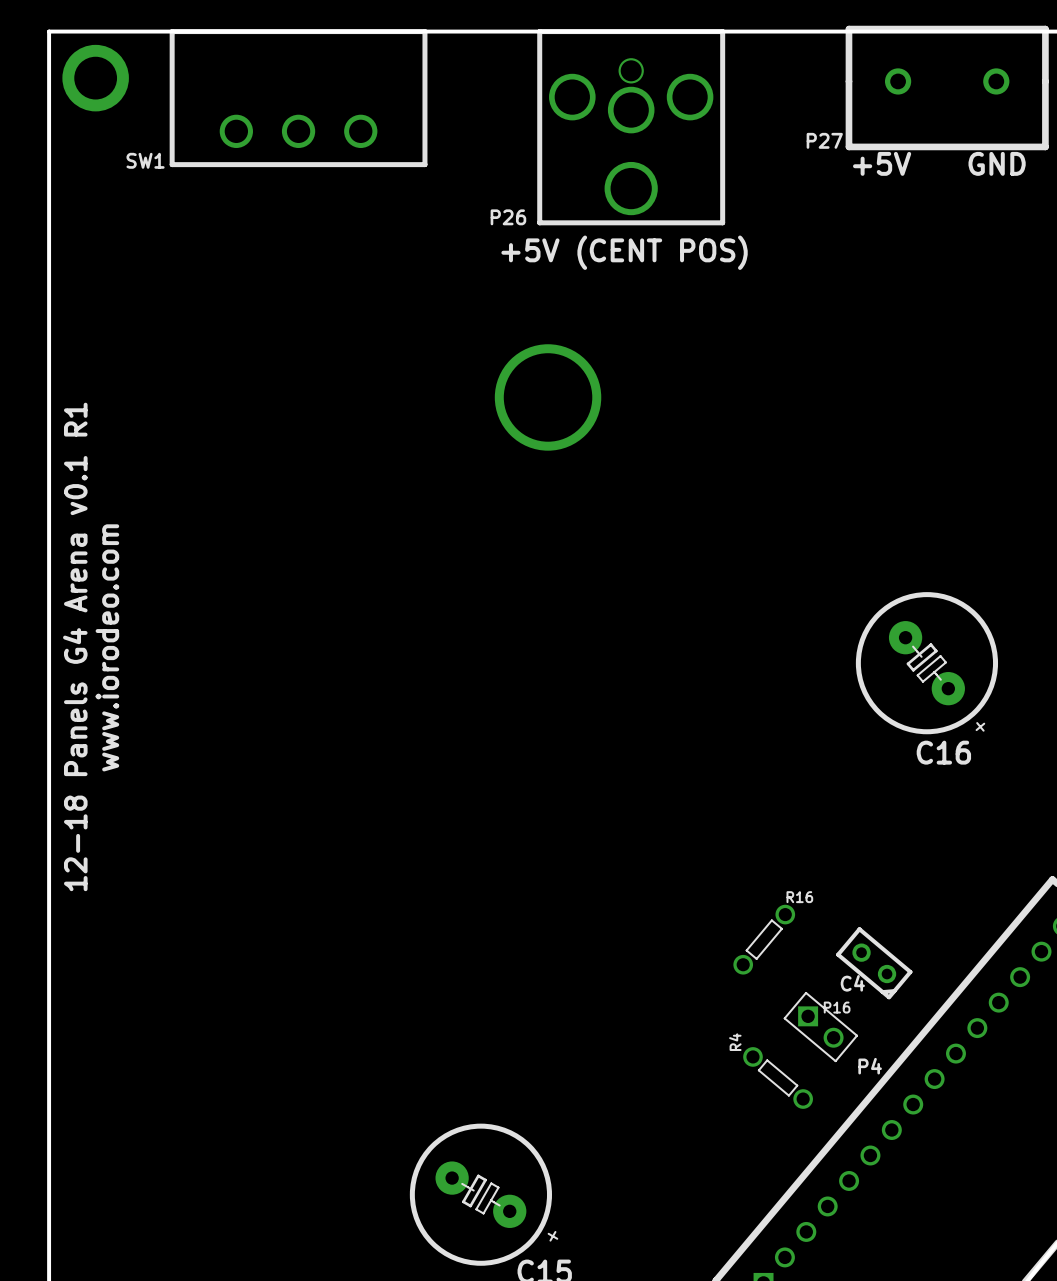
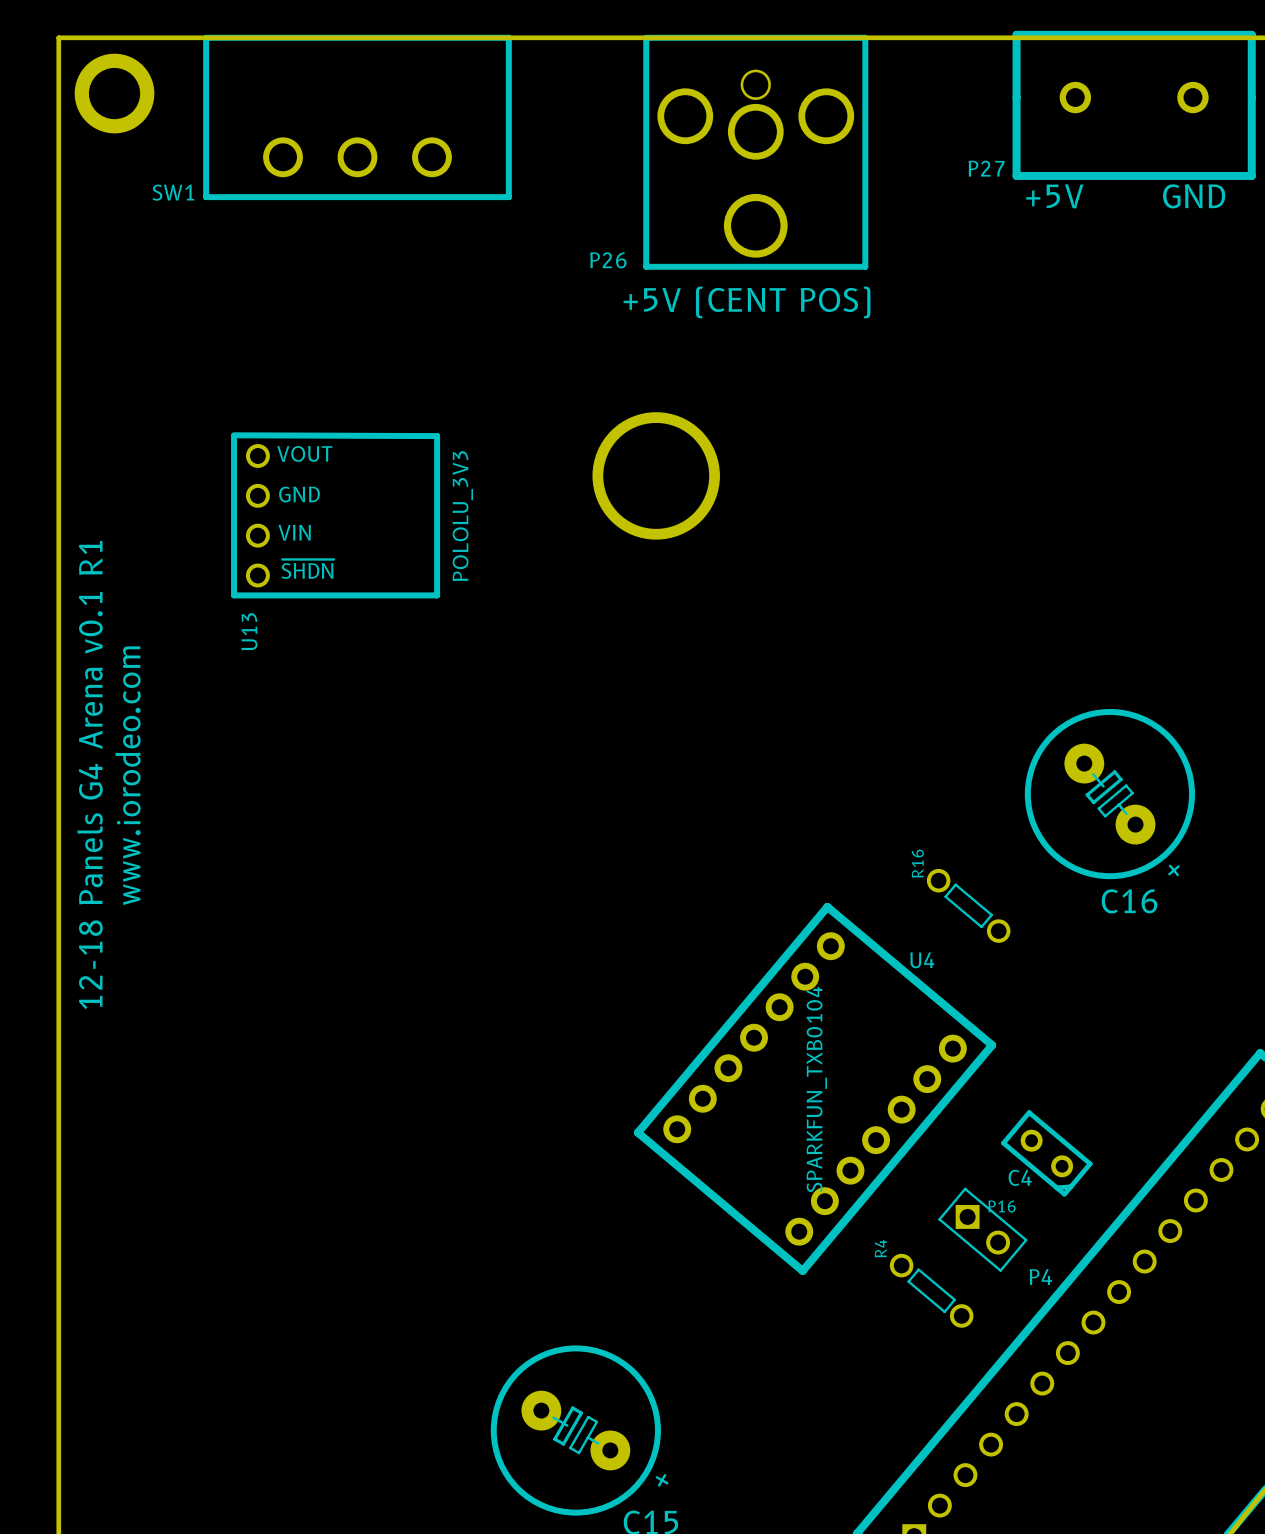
U13: none -> POLOLU_3V3 (335, 515)
R16 name position: R16 (799, 897) -> R16 (917, 863)
U4: none -> SPARKFUN_TXB0104 (815, 1088)
R16 rotation: 0° (764, 939) -> 90° clockwise (968, 905)
R16 position: (764, 939) -> (968, 905)

